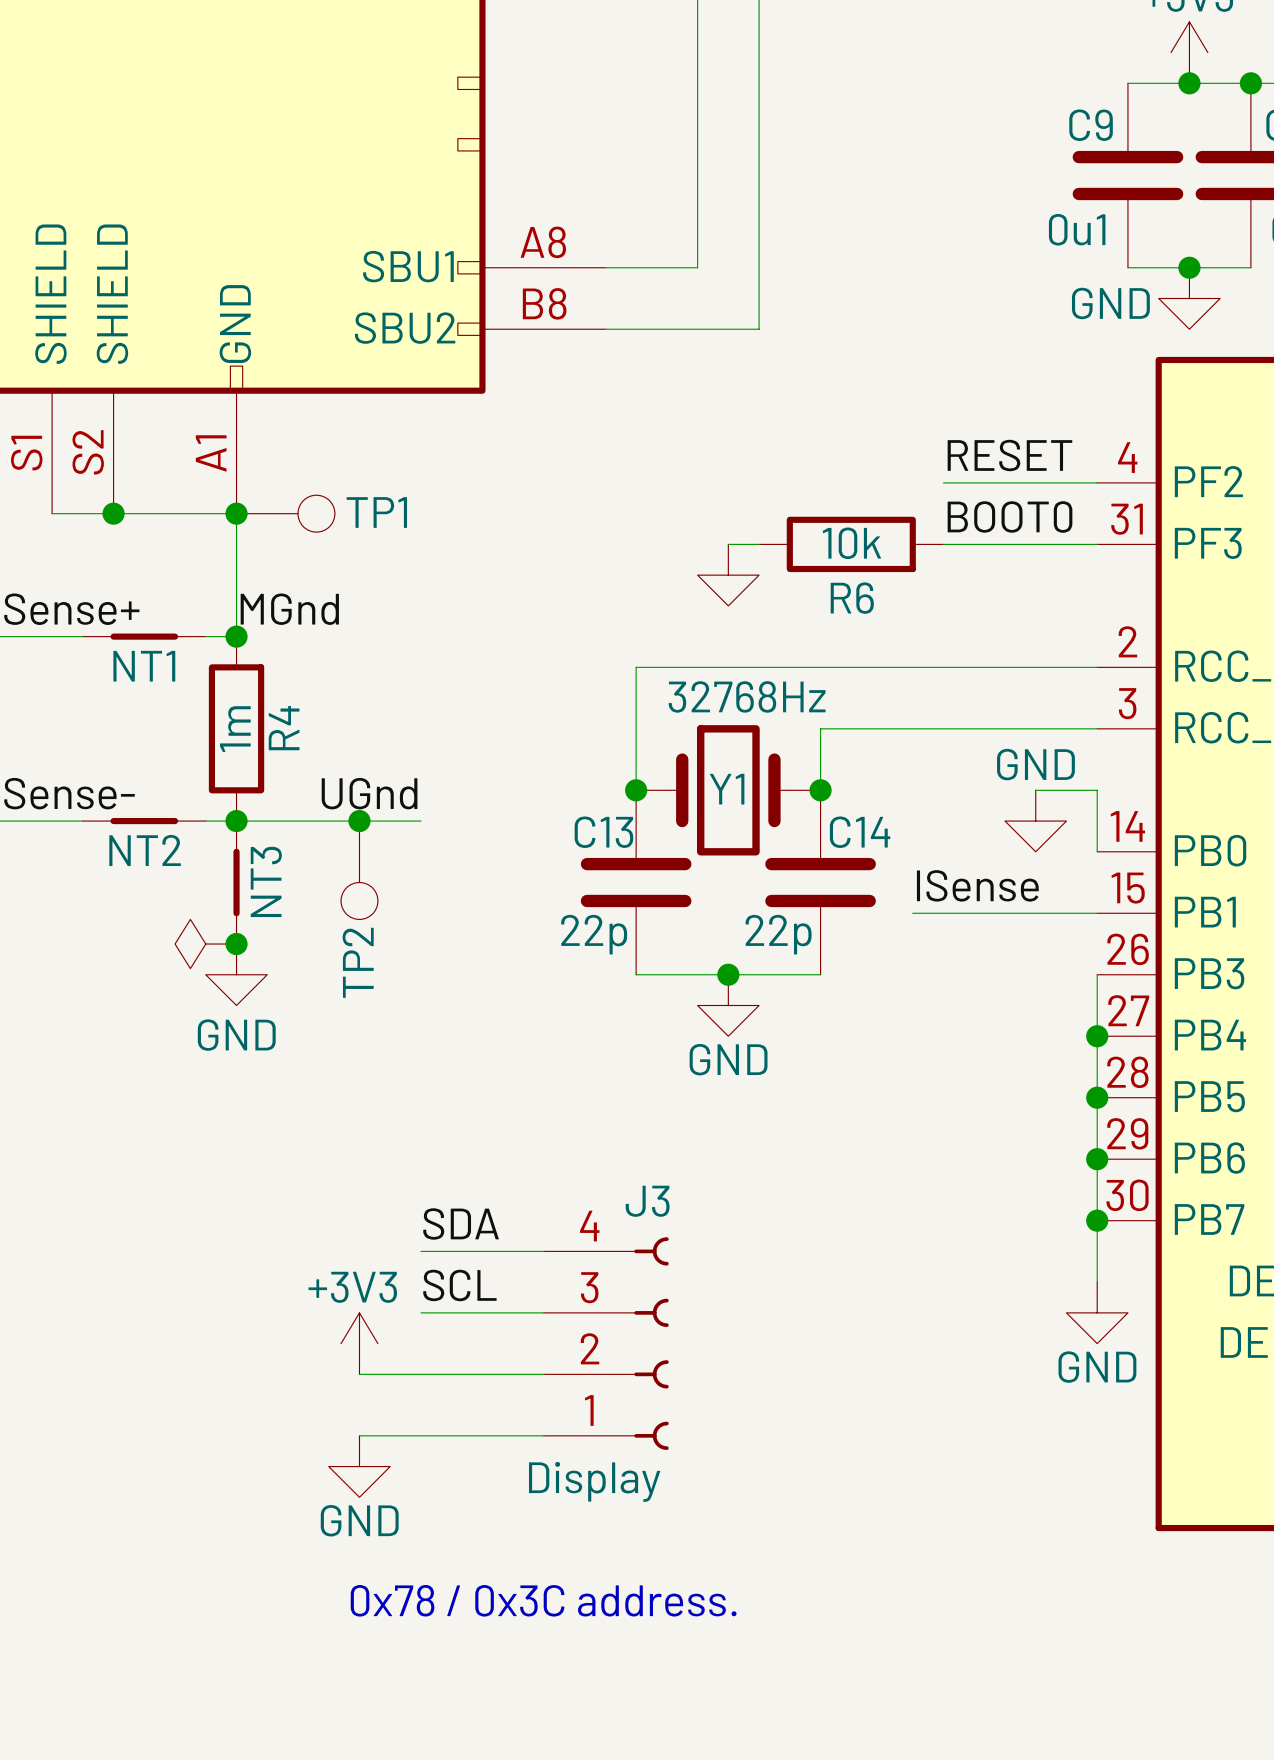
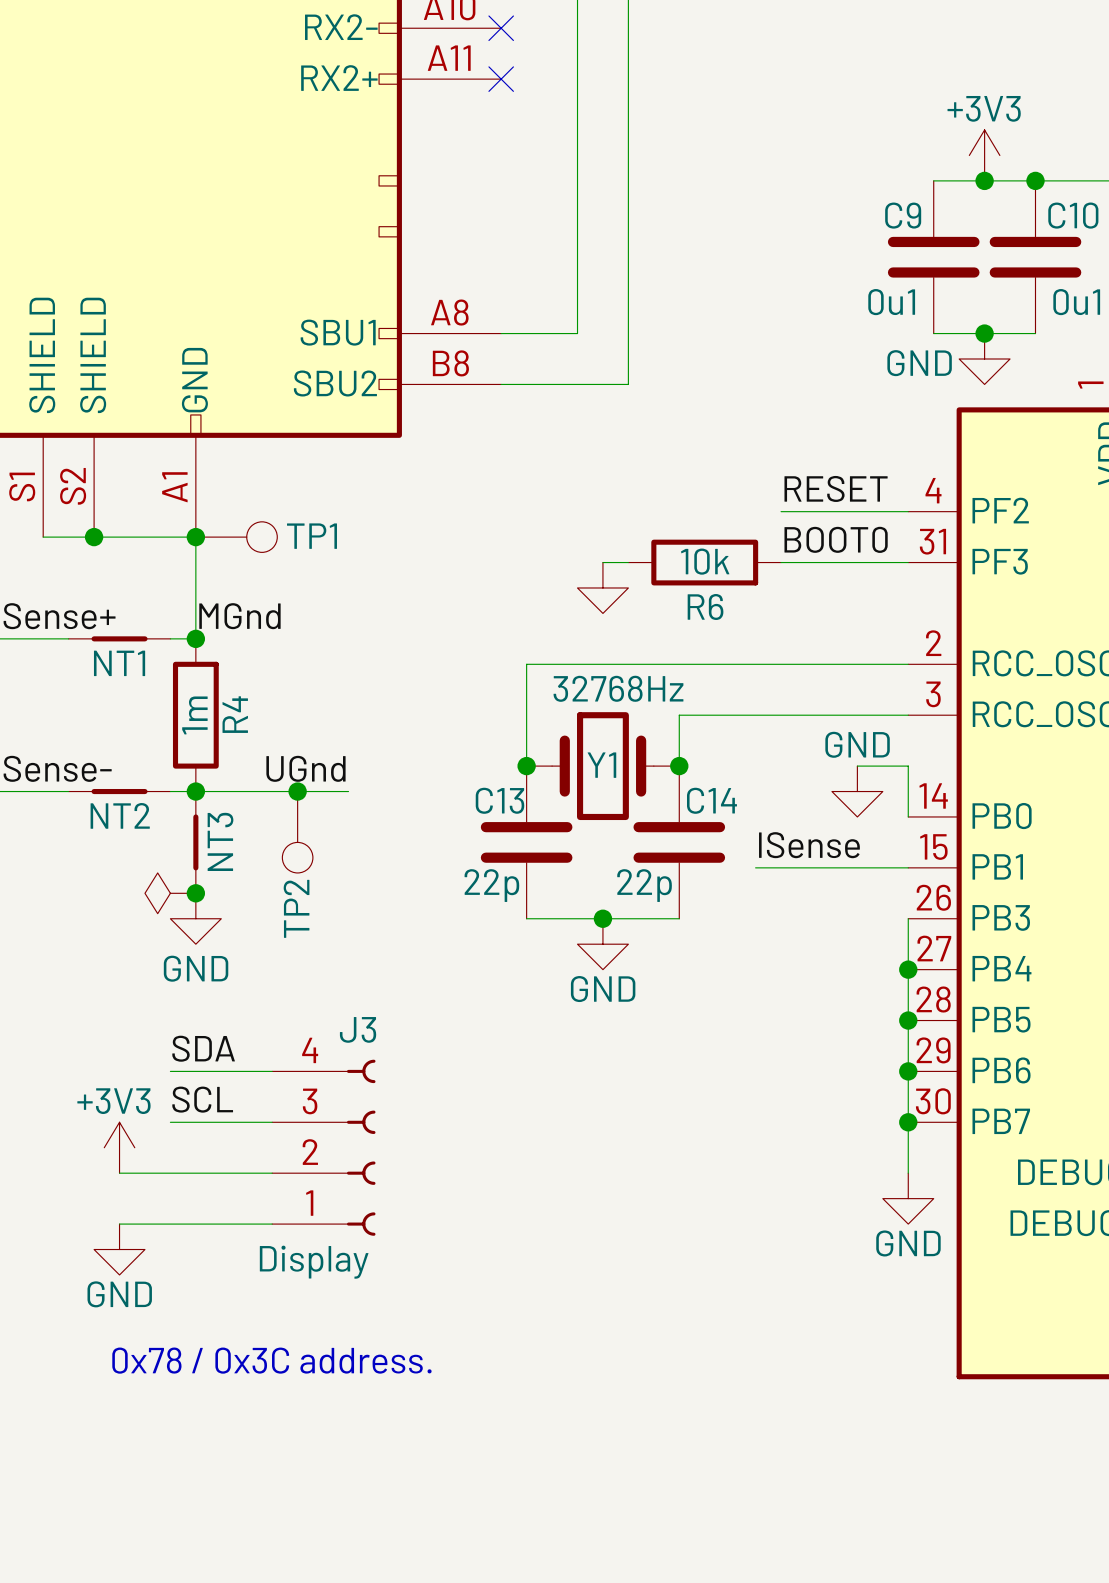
label position: SDA (461, 1223) -> SDA (203, 1048)
wire: (420, 1251) (543, 1251) -> (170, 1122) (272, 1122)
label position: SCL (459, 1285) -> SCL (202, 1099)
wire: (420, 1312) (543, 1312) -> (170, 1071) (272, 1071)
power symbol position: +3V3 (359, 1343) -> +3V3 (119, 1147)
J3 position: (606, 1343) -> (323, 1147)
wire: (359, 1374) (543, 1374) -> (119, 1224) (272, 1224)
wire: (359, 1435) (543, 1435) -> (119, 1173) (272, 1173)
power symbol position: GND (359, 1466) -> GND (119, 1249)
text position: 0x78 / 0x3C address. (543, 1600) -> 0x78 / 0x3C address. (271, 1360)

